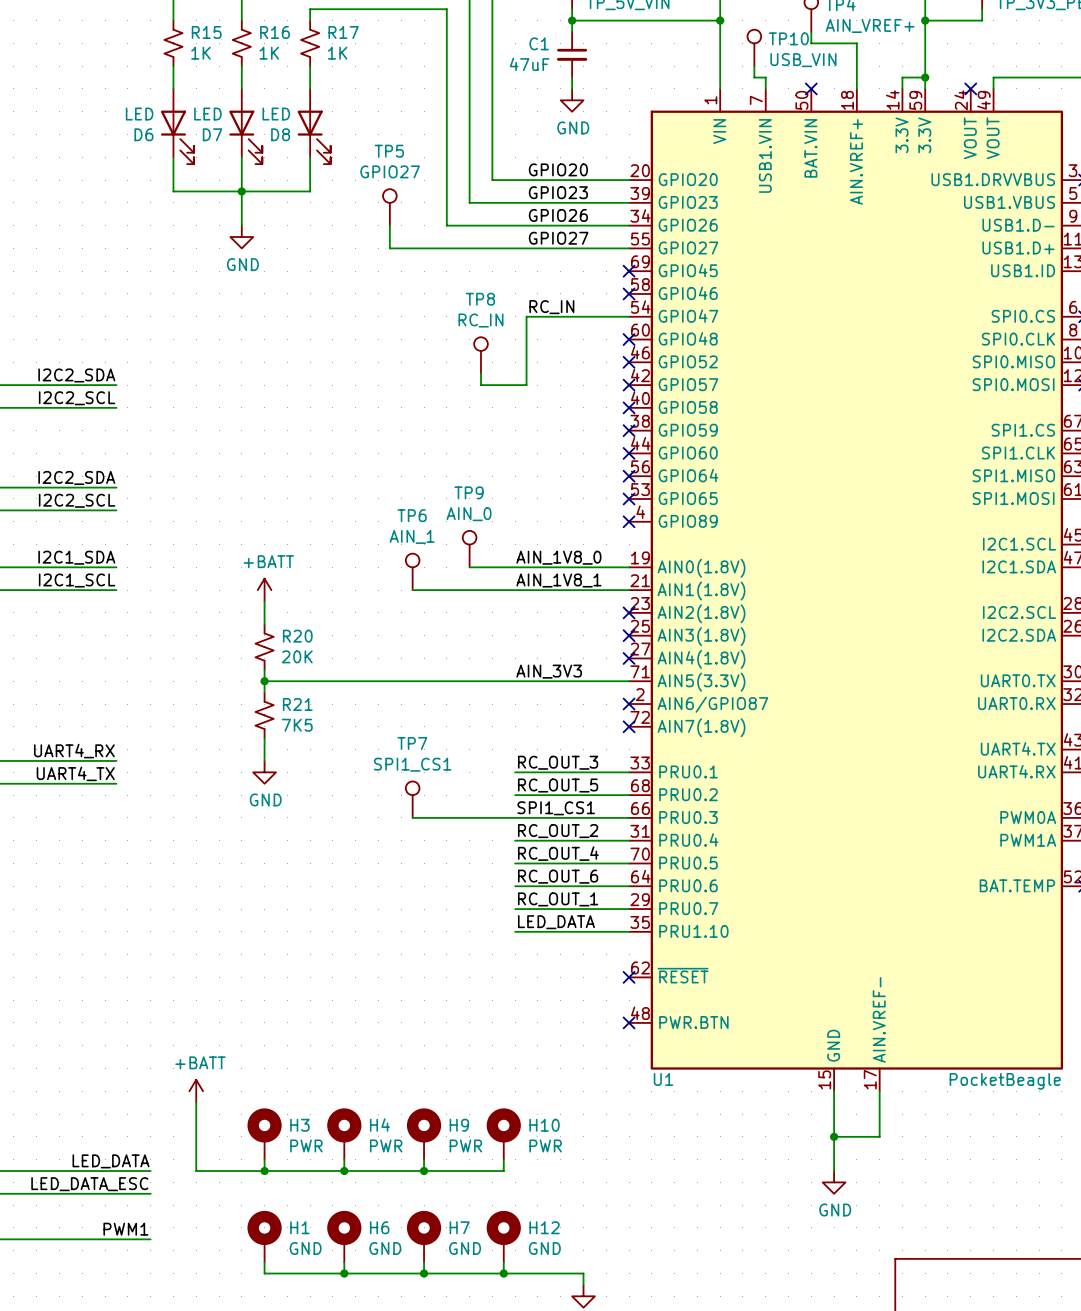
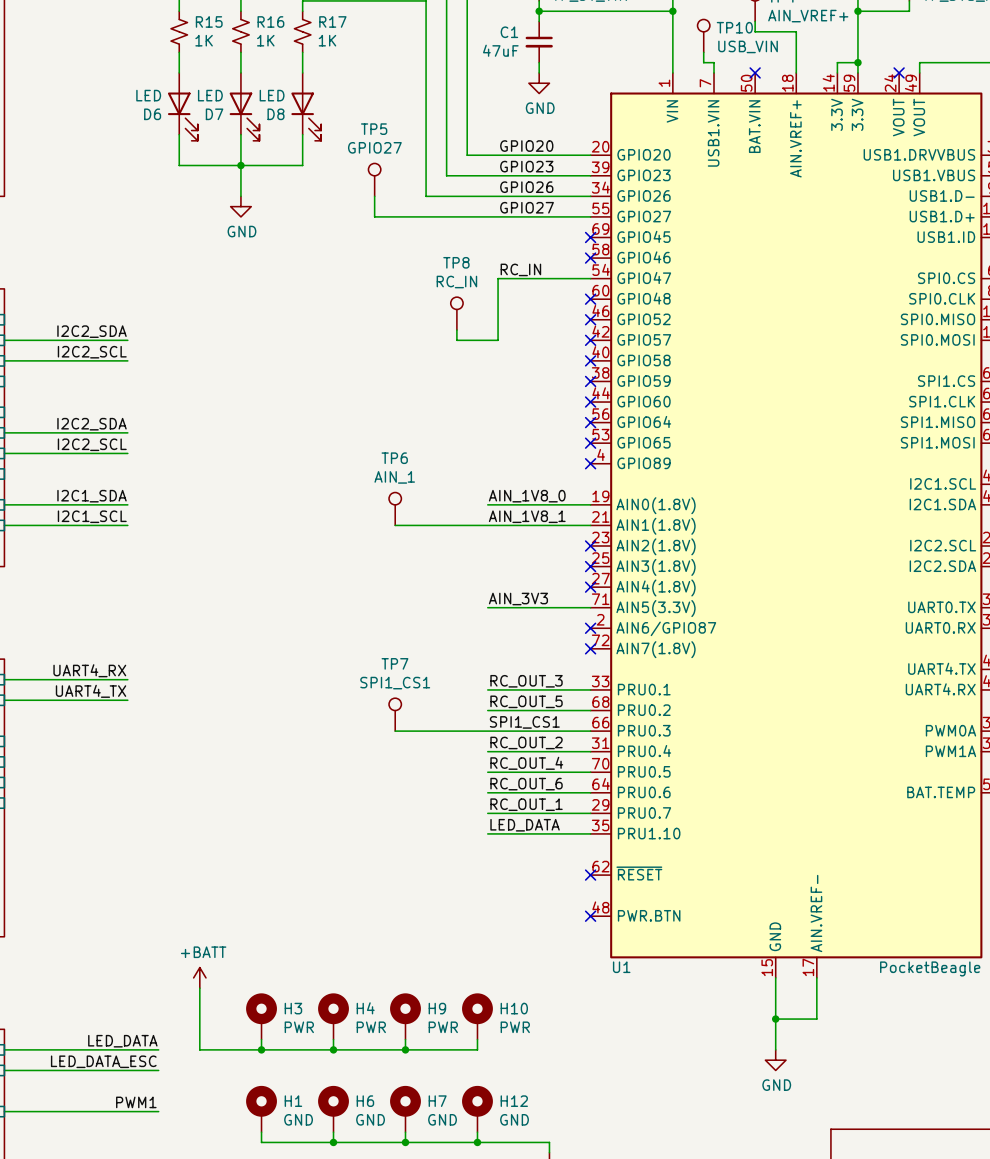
TP9: AIN_0 (469, 549) -> none
wire: (469, 567) (515, 567) -> none
power symbol: +BATT (264, 590) -> none
wire: (264, 601) (264, 624) -> none
R20: 20K (264, 647) -> none
wire: (264, 669) (264, 692) -> none
wire: (264, 681) (515, 681) -> none
junction: (264, 681) -> none
R21: 7K5 (264, 715) -> none
wire: (264, 738) (264, 760) -> none
power symbol: GND (264, 772) -> none

